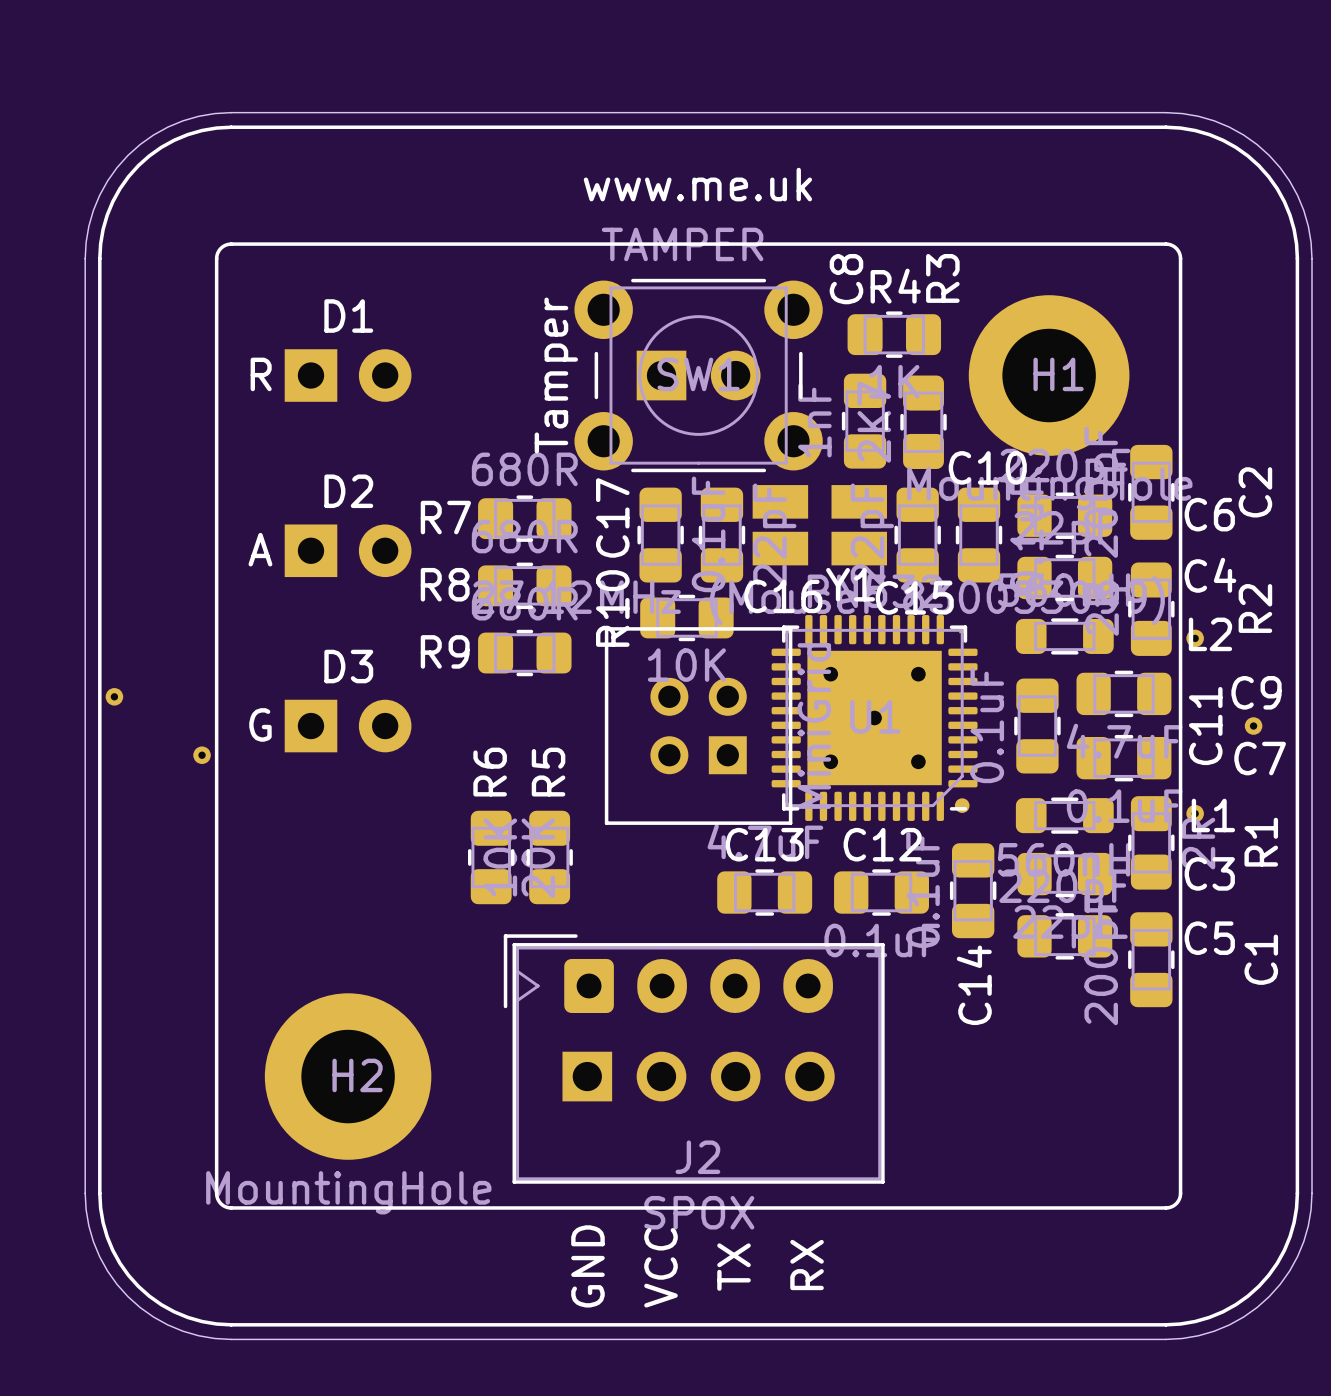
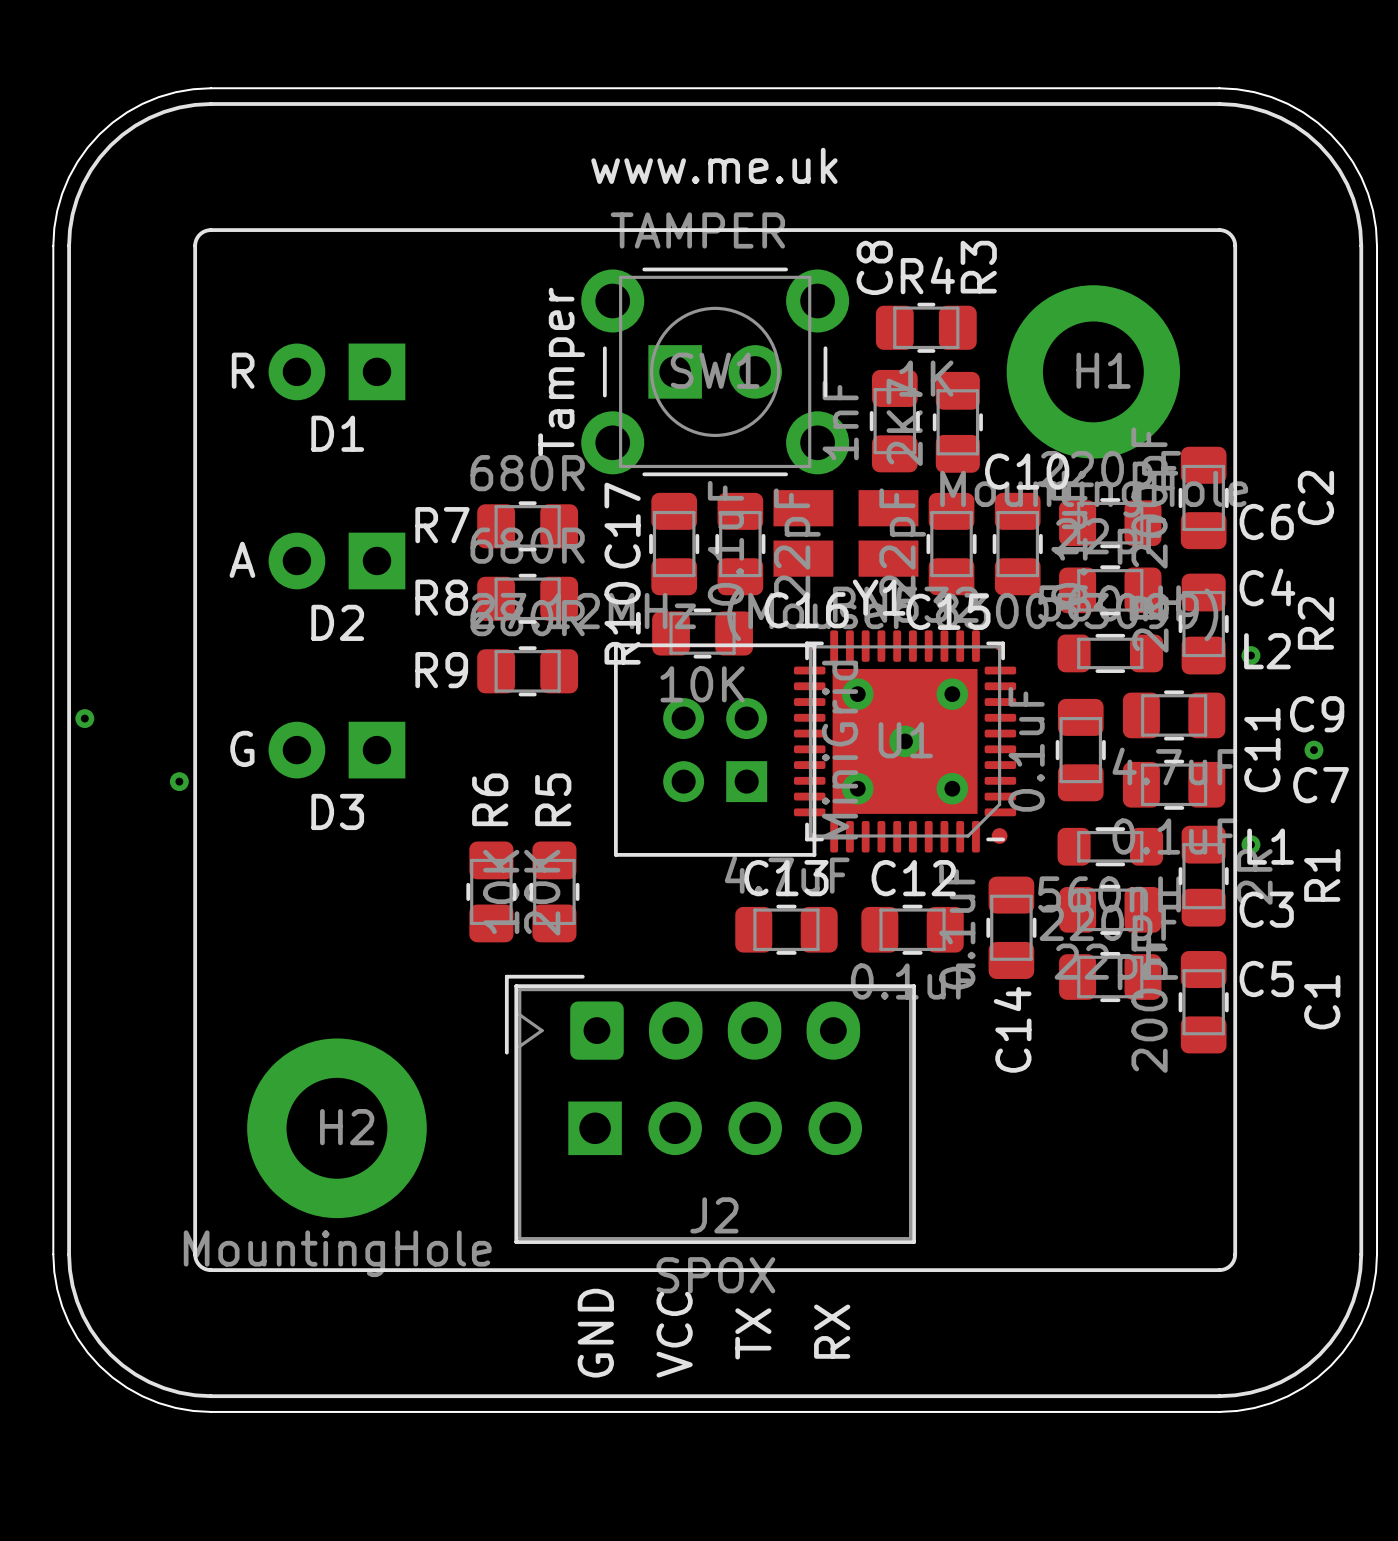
D1 rotation: 0° (348, 375) -> 180° (336, 371)
D2 rotation: 0° (348, 550) -> 180° (336, 561)
D3 rotation: 0° (348, 726) -> 180° (336, 750)

